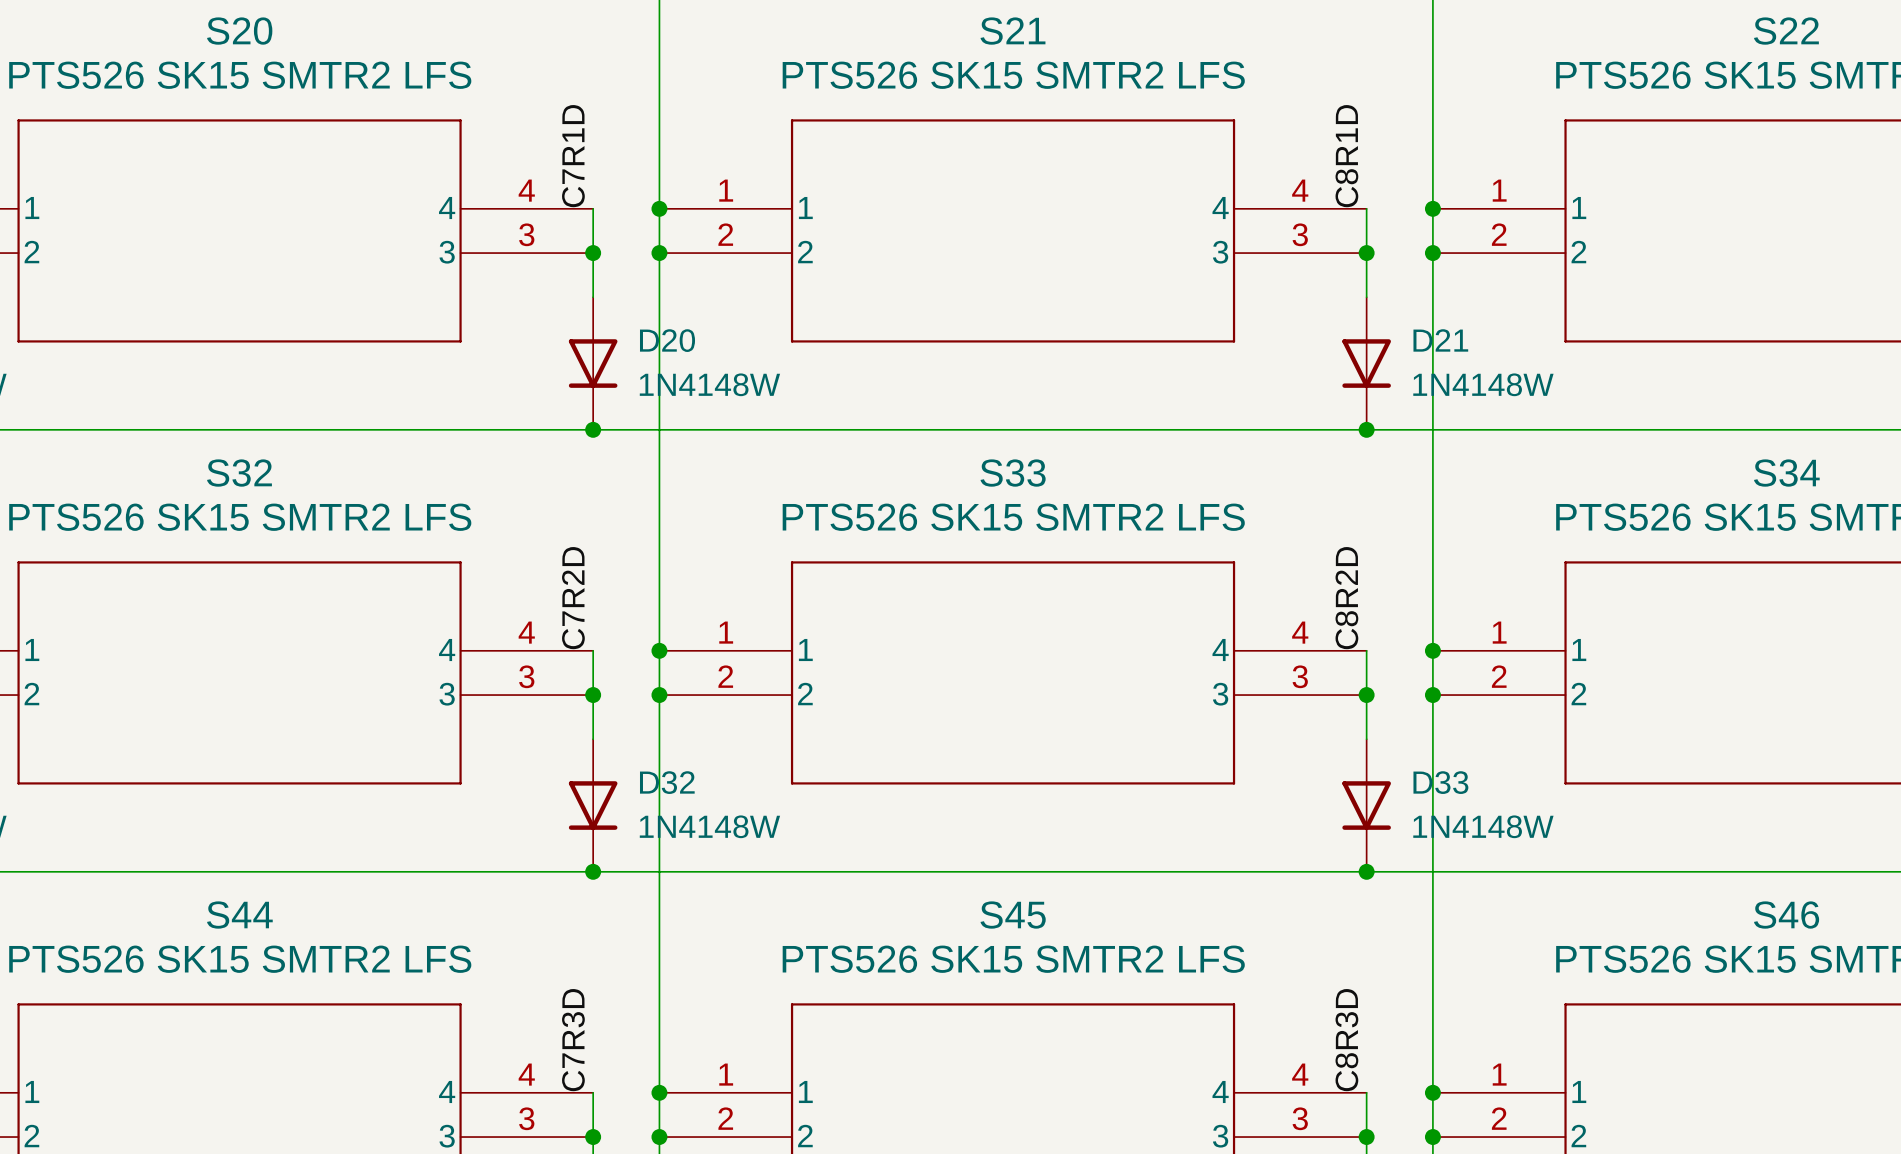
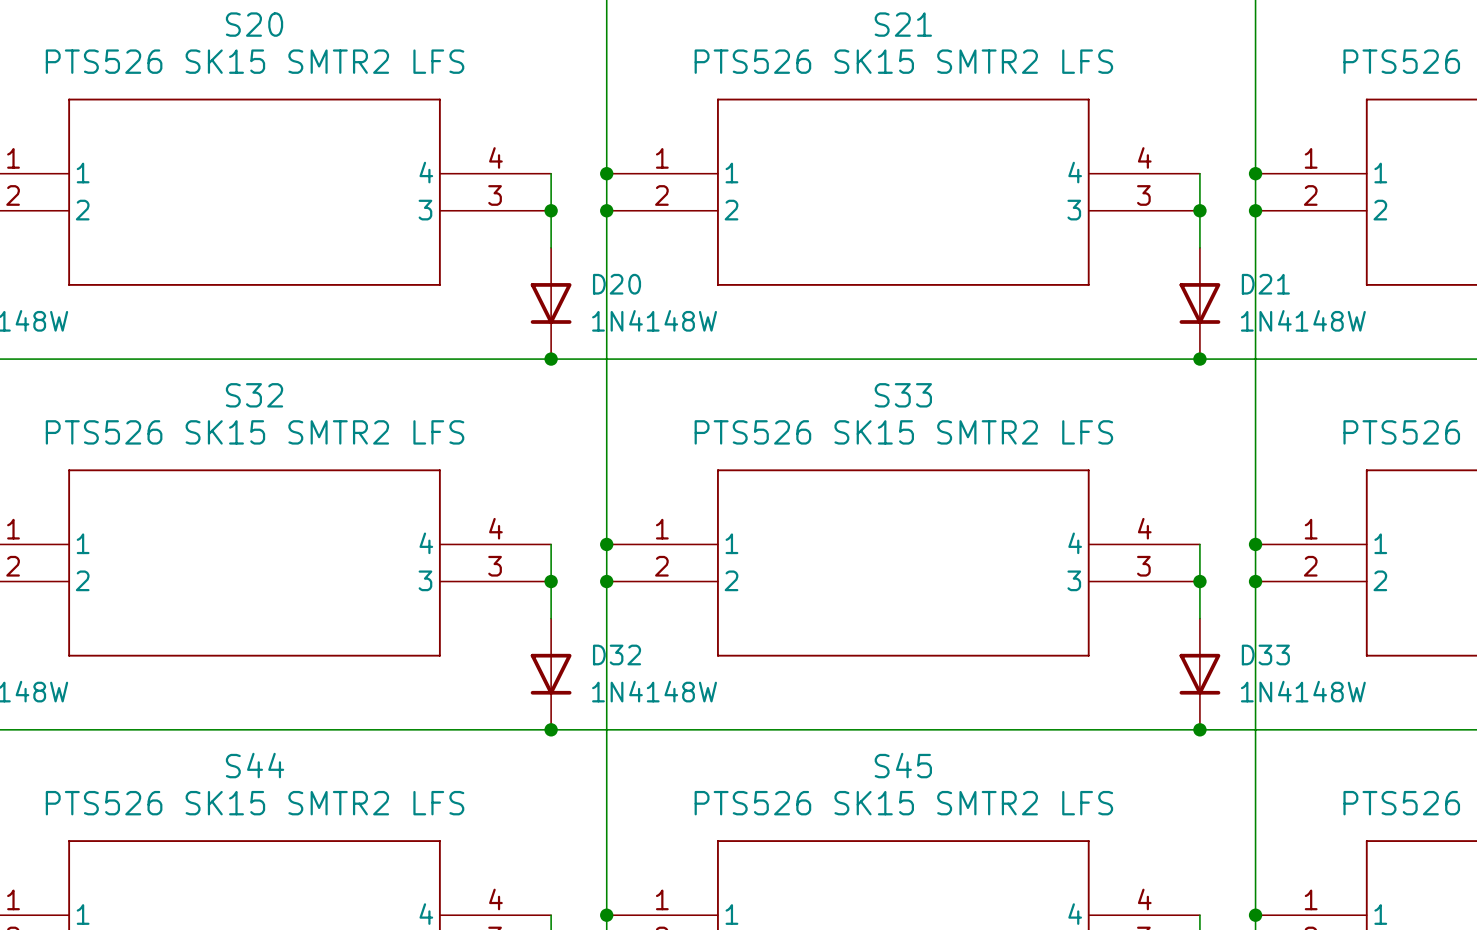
label: C7R1D (573, 156) -> none
label: C8R1D (1346, 156) -> none
label: C7R2D (573, 598) -> none
label: C8R2D (1346, 598) -> none
label: C7R3D (573, 1040) -> none
label: C8R3D (1346, 1040) -> none

